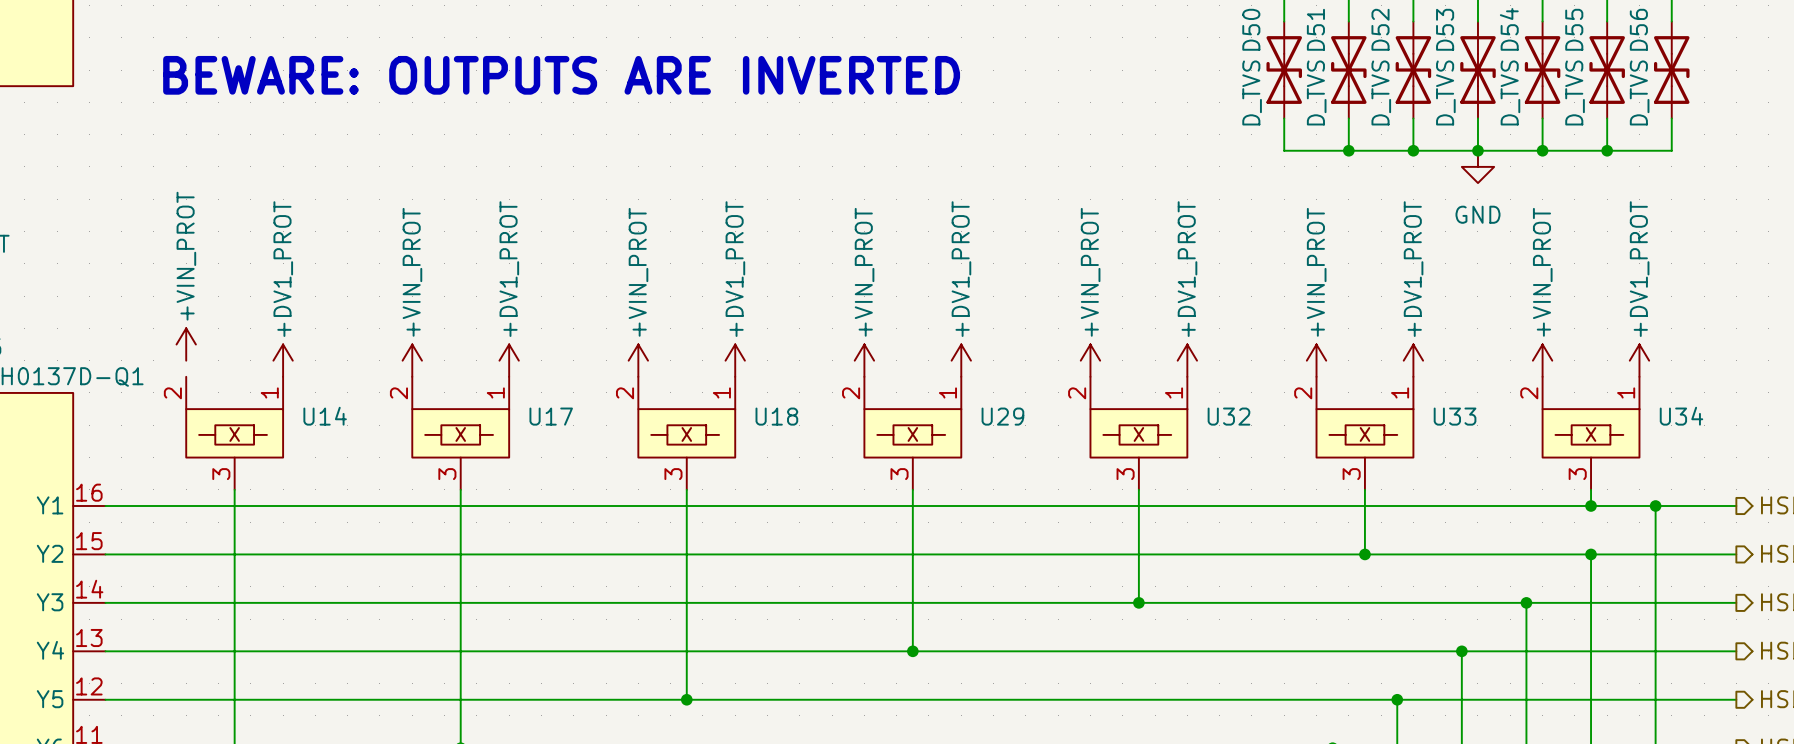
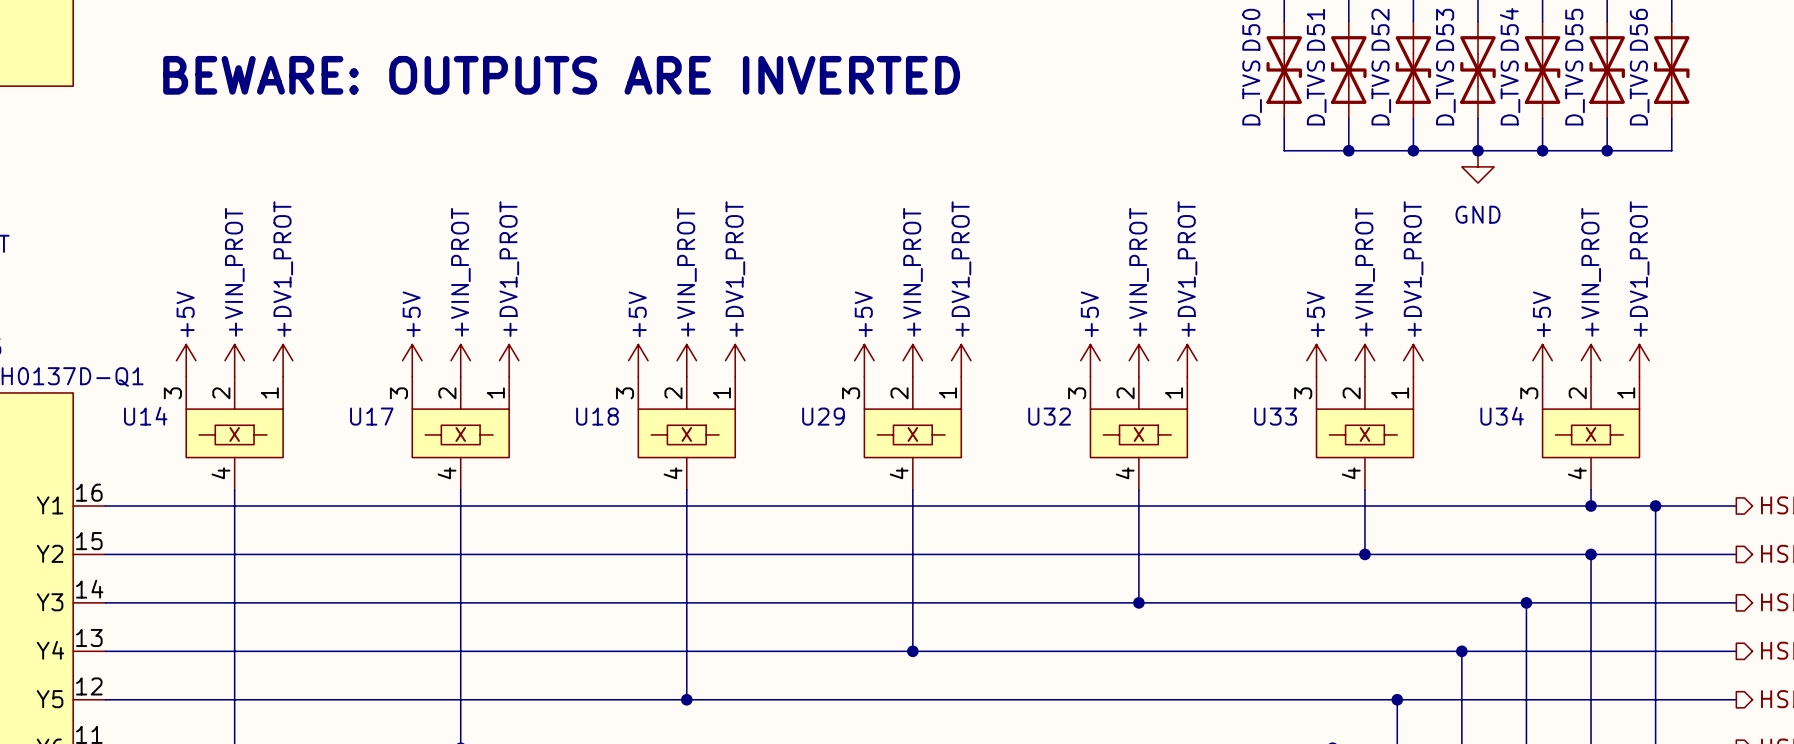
power symbol position: +VIN_PROT (186, 344) -> +VIN_PROT (234, 360)
power symbol: none -> +5V (186, 360)
power symbol: +VIN_PROT (412, 360) -> +5V (412, 360)
power symbol: none -> +VIN_PROT (460, 360)
power symbol: +VIN_PROT (638, 360) -> +5V (638, 360)
power symbol: none -> +VIN_PROT (686, 360)
power symbol: +VIN_PROT (864, 360) -> +5V (864, 360)
power symbol: none -> +VIN_PROT (912, 360)
power symbol: +VIN_PROT (1090, 360) -> +5V (1090, 360)
power symbol: none -> +VIN_PROT (1138, 360)
power symbol: +VIN_PROT (1316, 360) -> +5V (1316, 360)
power symbol: none -> +VIN_PROT (1364, 360)
power symbol: +VIN_PROT (1542, 360) -> +5V (1542, 360)
power symbol: none -> +VIN_PROT (1591, 360)
U14 symbol: [186, 376, 284, 490] -> [186, 376, 284, 490]
U17 symbol: [412, 376, 510, 490] -> [412, 376, 510, 490]
U18 symbol: [638, 376, 736, 490] -> [638, 376, 736, 490]
U29 symbol: [864, 376, 962, 490] -> [864, 376, 962, 490]
U32 symbol: [1090, 376, 1188, 490] -> [1090, 376, 1188, 490]
U33 symbol: [1316, 376, 1414, 490] -> [1316, 376, 1414, 490]
U34 symbol: [1542, 376, 1640, 490] -> [1542, 376, 1640, 490]
U14 name position: U14 (325, 416) -> U14 (145, 416)
U17 name position: U17 (551, 416) -> U17 (371, 416)
U18 name position: U18 (776, 416) -> U18 (597, 416)
U29 name position: U29 (1002, 416) -> U29 (823, 416)
U32 name position: U32 (1228, 416) -> U32 (1049, 416)
U33 name position: U33 (1455, 416) -> U33 (1275, 416)
U34 name position: U34 (1681, 416) -> U34 (1502, 416)

